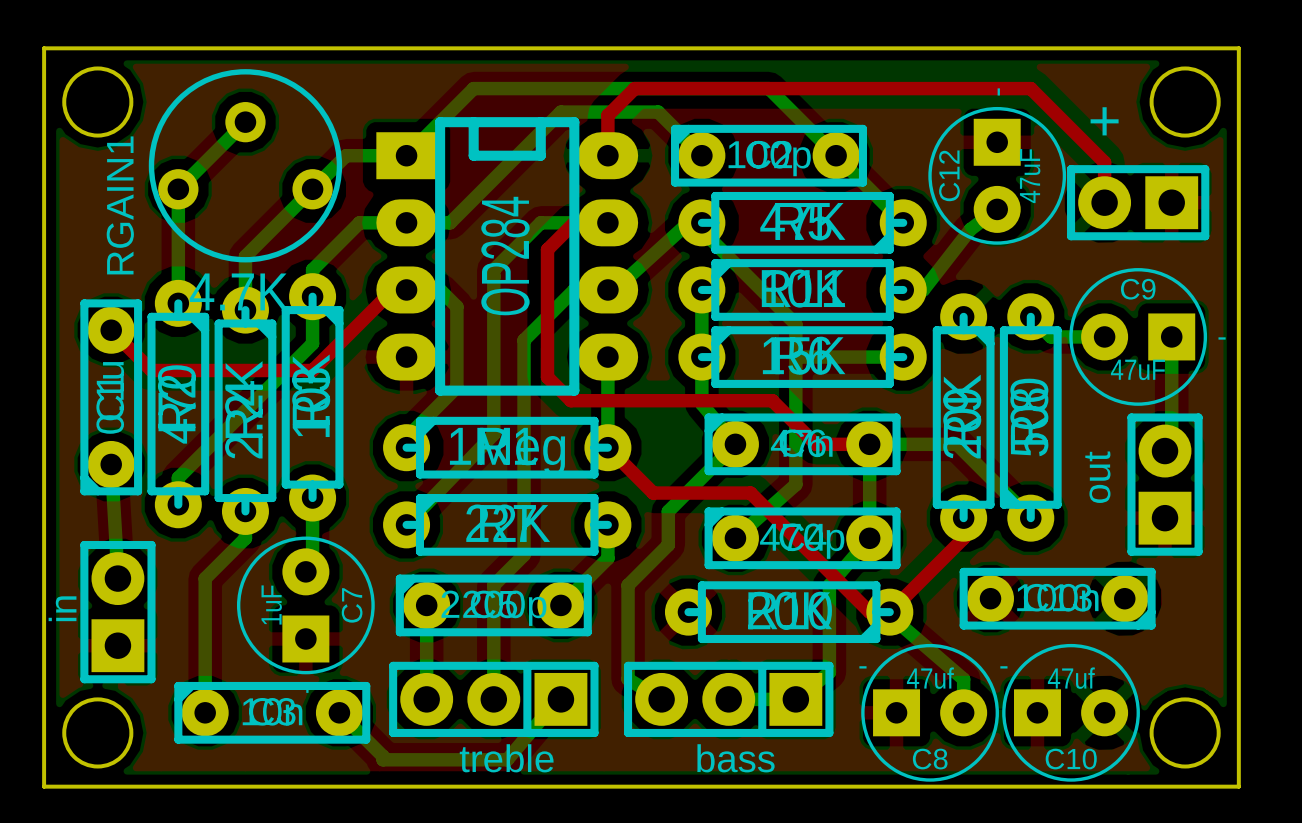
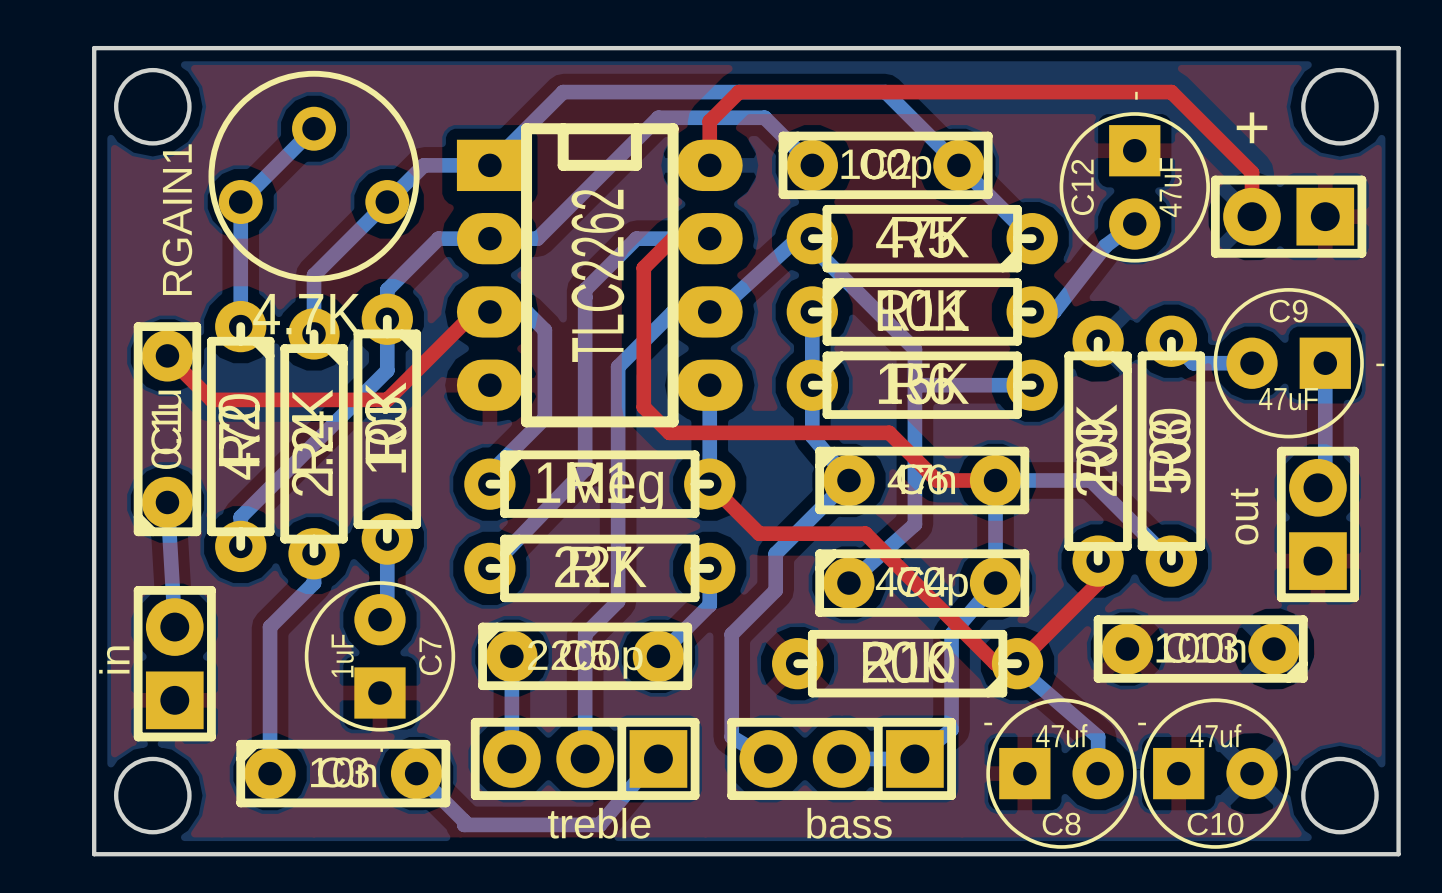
part value: OP284 (505, 256) -> TLC2262 (597, 275)

